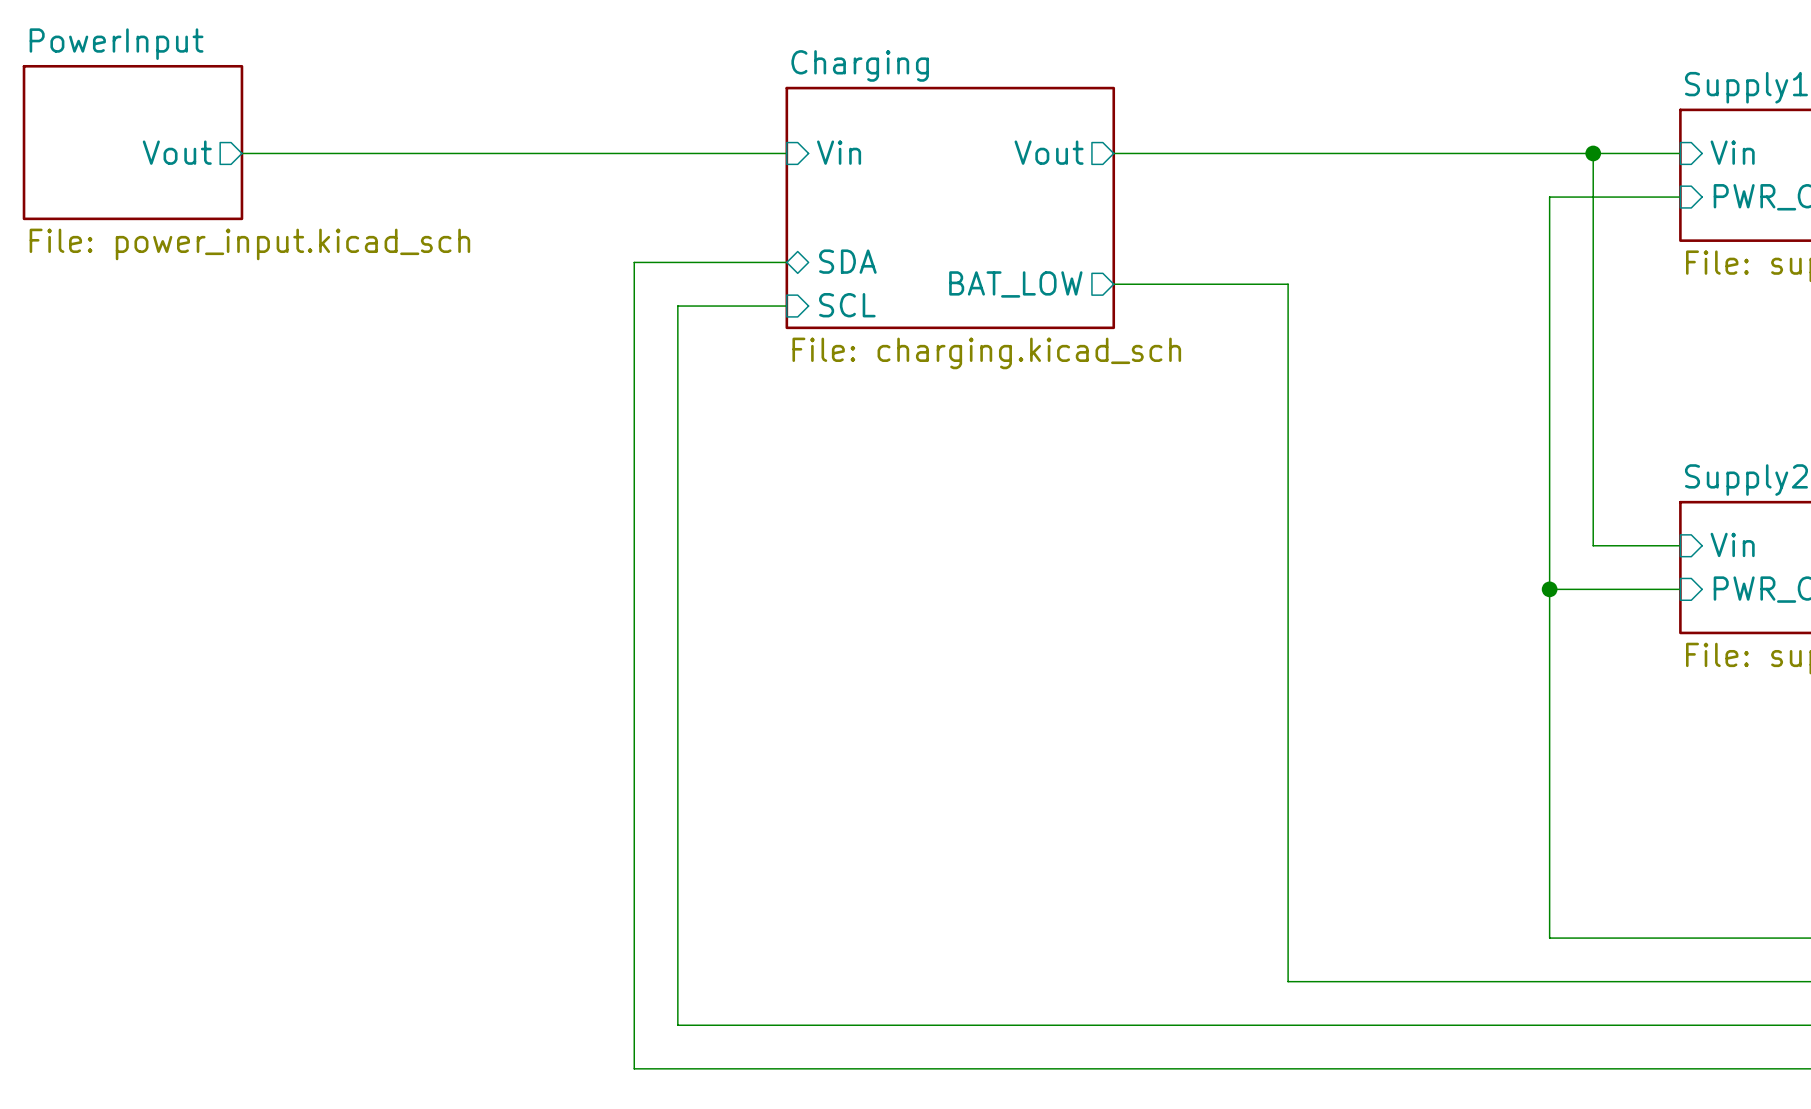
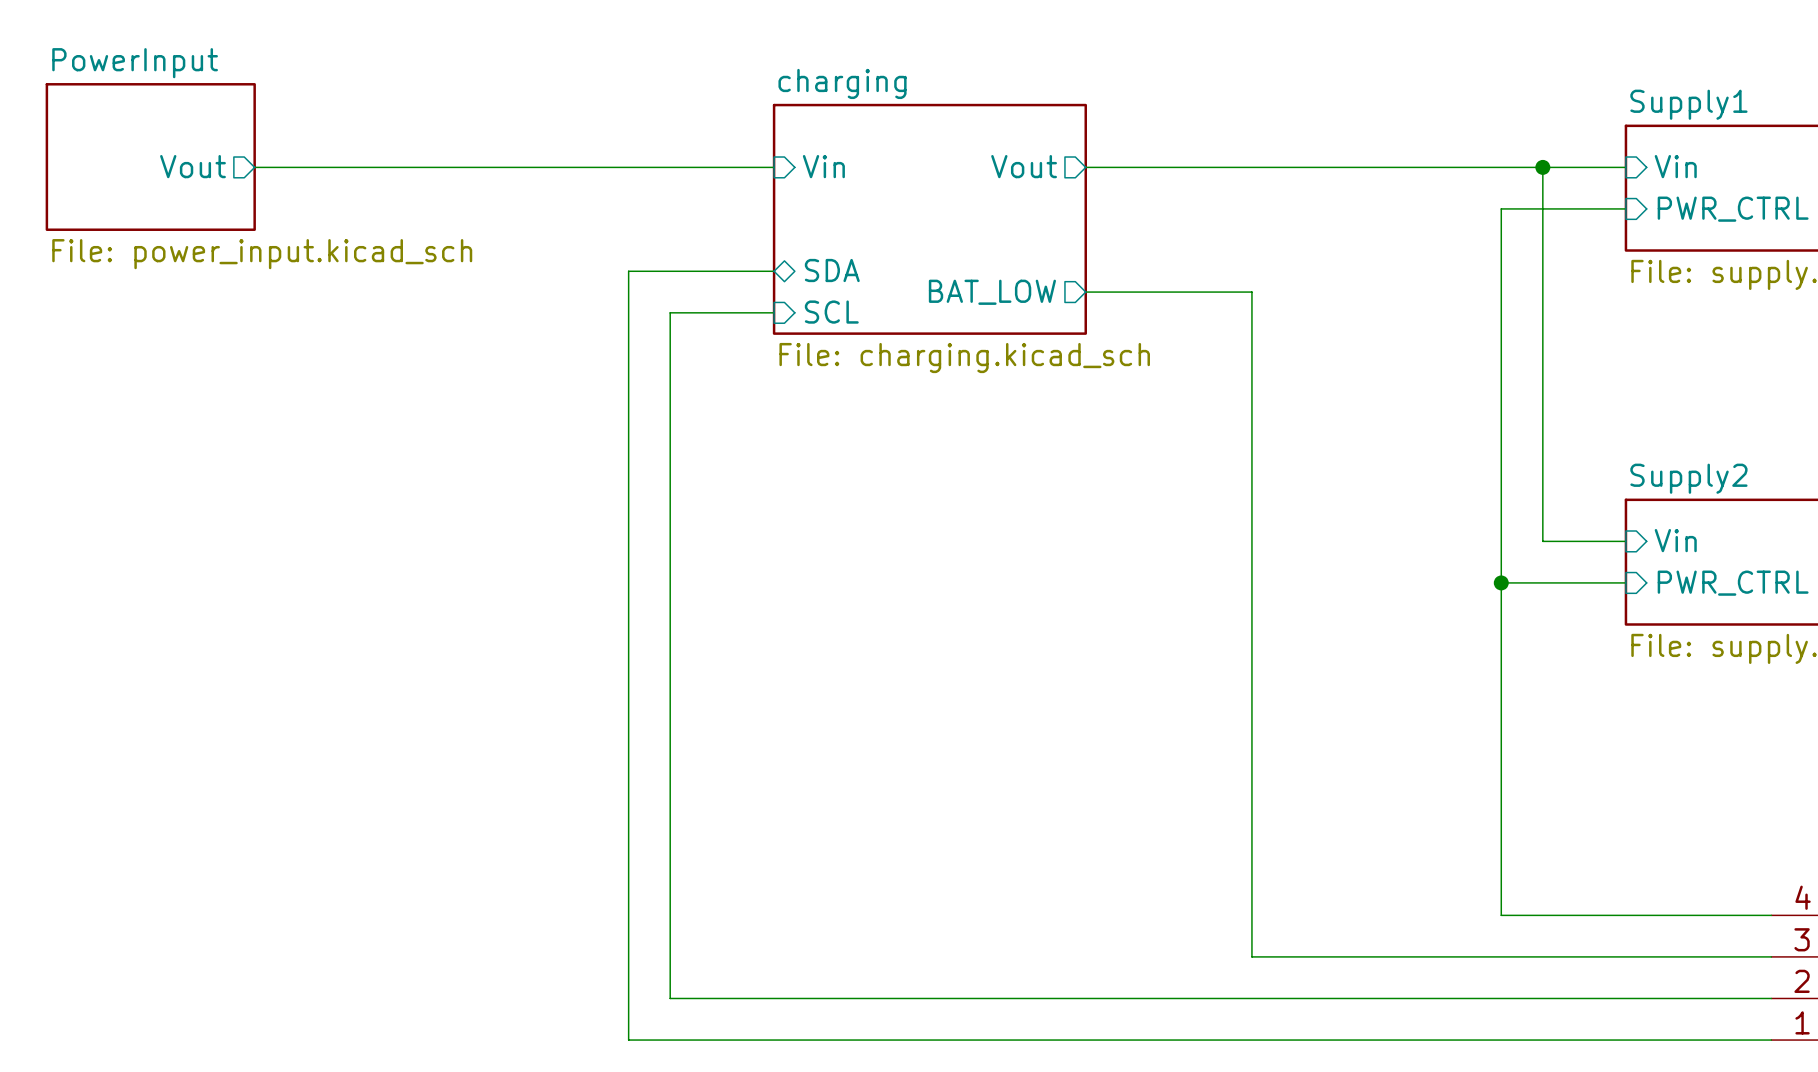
sheet Charging name: Charging (860, 65) -> charging (842, 83)

